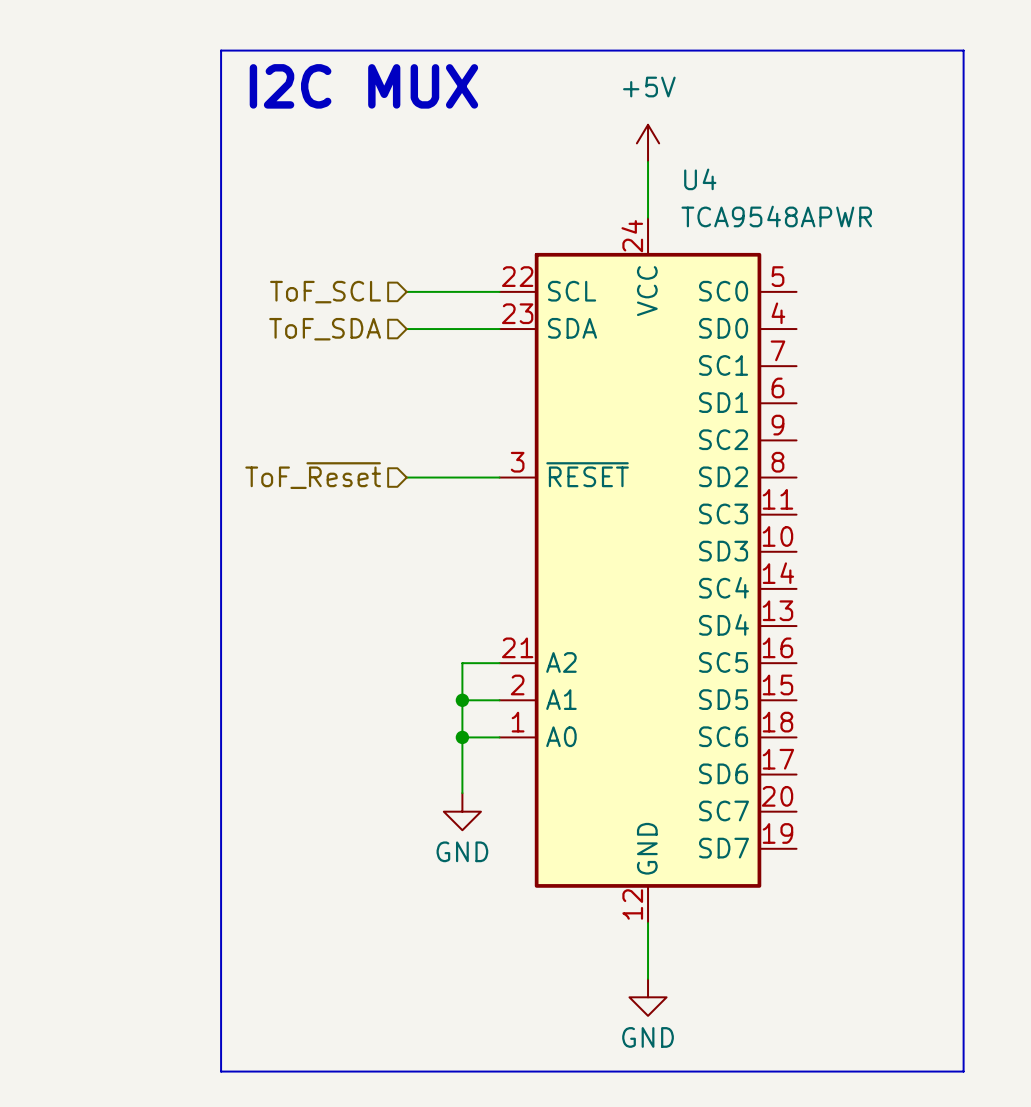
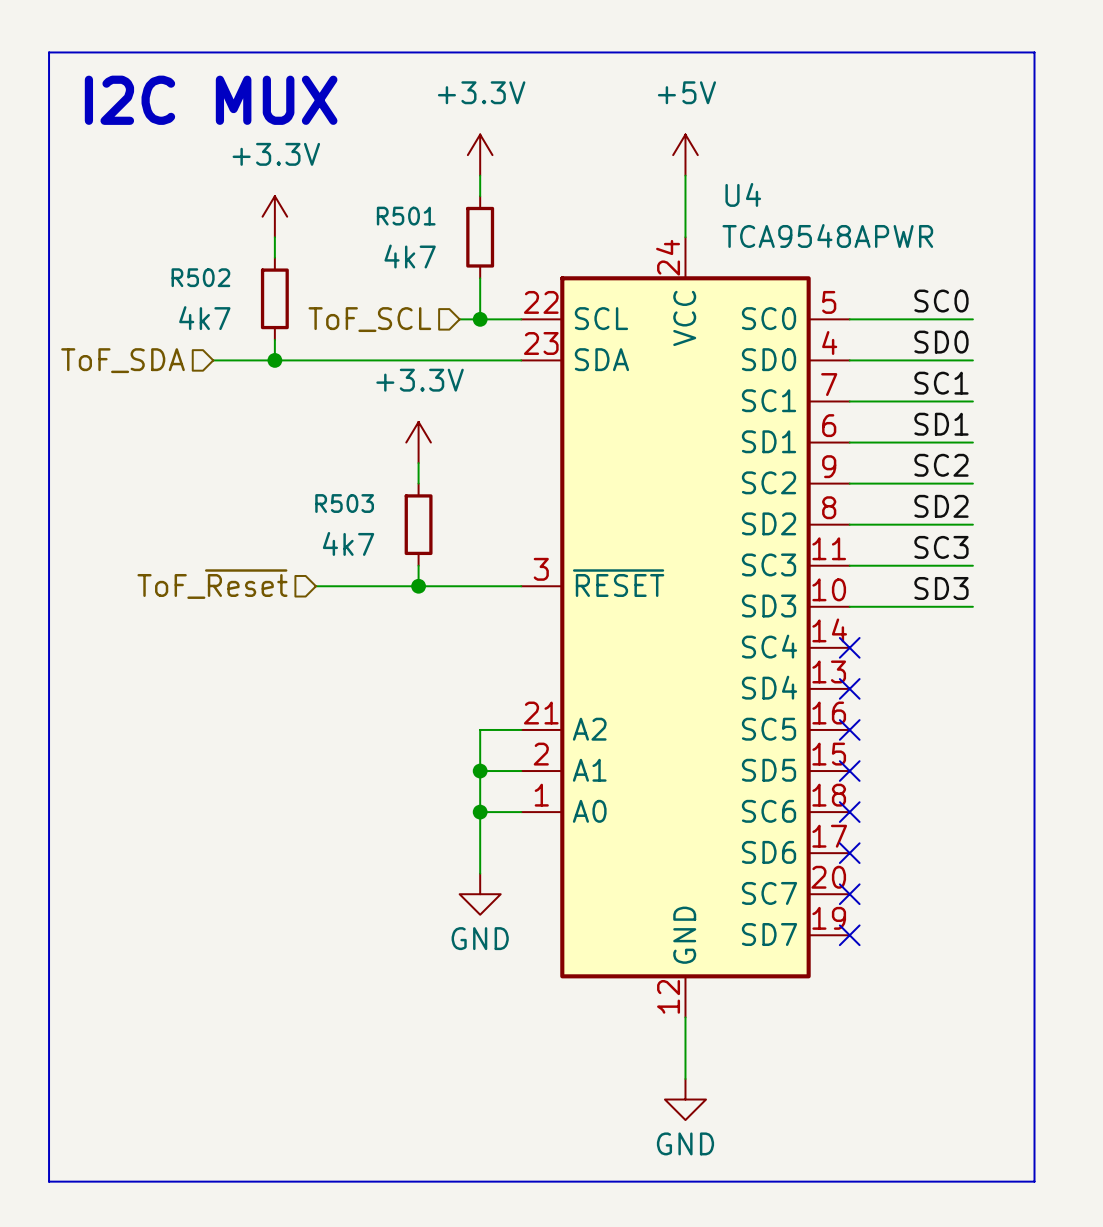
line: (221, 50) (221, 1071) -> (213, 52) (49, 52) (49, 1181) (213, 1181)
text position: I2C MUX (363, 86) -> I2C MUX (211, 100)
power symbol: none -> +3.3V (480, 155)
wire: none -> (480, 175) (480, 196)
power symbol: none -> +3.3V (274, 216)
wire: none -> (274, 237) (274, 257)
R501: none -> 4k7 (480, 237)
U4 symbol: [499, 217, 797, 924] -> [521, 237, 850, 1018]
wire: none -> (480, 278) (480, 319)
R502: none -> 4k7 (274, 298)
label: none -> SC0 (941, 301)
wire: (406, 291) (443, 291) -> none
junction: none -> (480, 319)
wire: none -> (849, 319) (972, 319)
hierarchical label position: ToF_SCL (325, 292) -> ToF_SCL (369, 319)
wire: none -> (274, 339) (274, 360)
label: none -> SD0 (941, 342)
wire: none -> (213, 360) (418, 360)
junction: none -> (274, 360)
hierarchical label position: ToF_SDA (325, 329) -> ToF_SDA (123, 360)
wire: none -> (849, 360) (972, 360)
label: none -> SC1 (941, 383)
wire: none -> (849, 401) (972, 401)
label: none -> SD1 (941, 424)
power symbol: none -> +3.3V (418, 442)
wire: none -> (849, 442) (972, 442)
wire: none -> (418, 463) (418, 483)
label: none -> SC2 (941, 465)
wire: none -> (849, 483) (972, 483)
label: none -> SD2 (941, 506)
hierarchical label position: ToF_~{Reset} (313, 475) -> ToF_~{Reset} (212, 584)
wire: (406, 477) (499, 477) -> none
R503: none -> 4k7 (418, 524)
wire: none -> (849, 524) (972, 524)
label: none -> SC3 (941, 547)
wire: none -> (418, 565) (418, 586)
wire: none -> (849, 565) (972, 565)
wire: none -> (315, 586) (521, 586)
junction: none -> (418, 586)
label: none -> SD3 (941, 588)
wire: none -> (849, 606) (972, 606)
no-connect mark: none -> (849, 647)
no-connect mark: none -> (849, 688)
no-connect mark: none -> (849, 729)
no-connect mark: none -> (849, 771)
no-connect mark: none -> (849, 812)
no-connect mark: none -> (849, 853)
no-connect mark: none -> (849, 894)
no-connect mark: none -> (849, 935)

